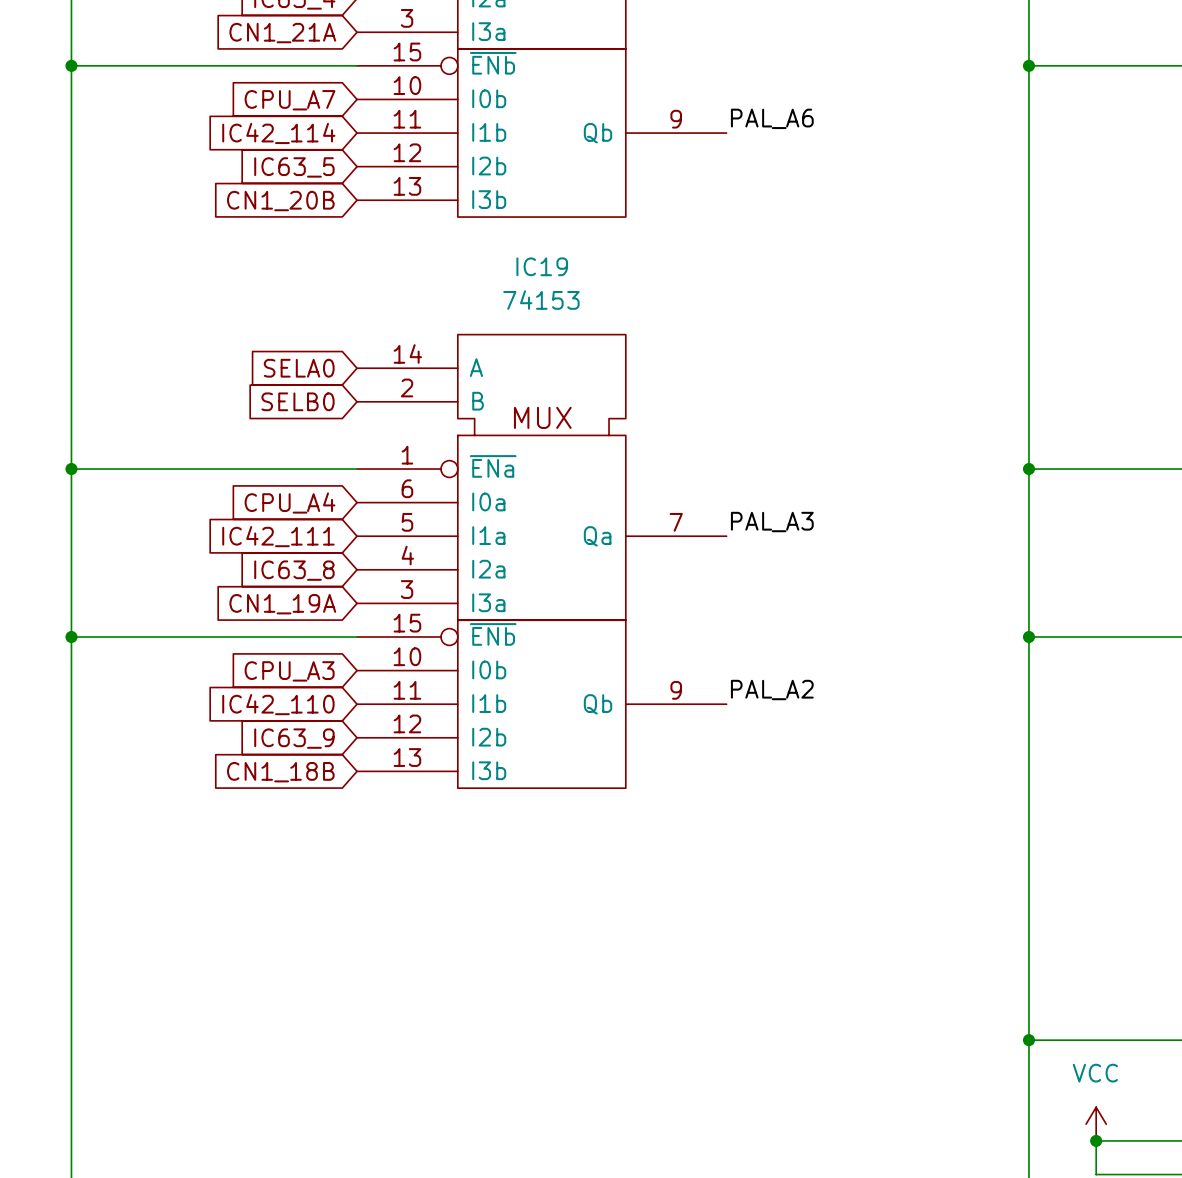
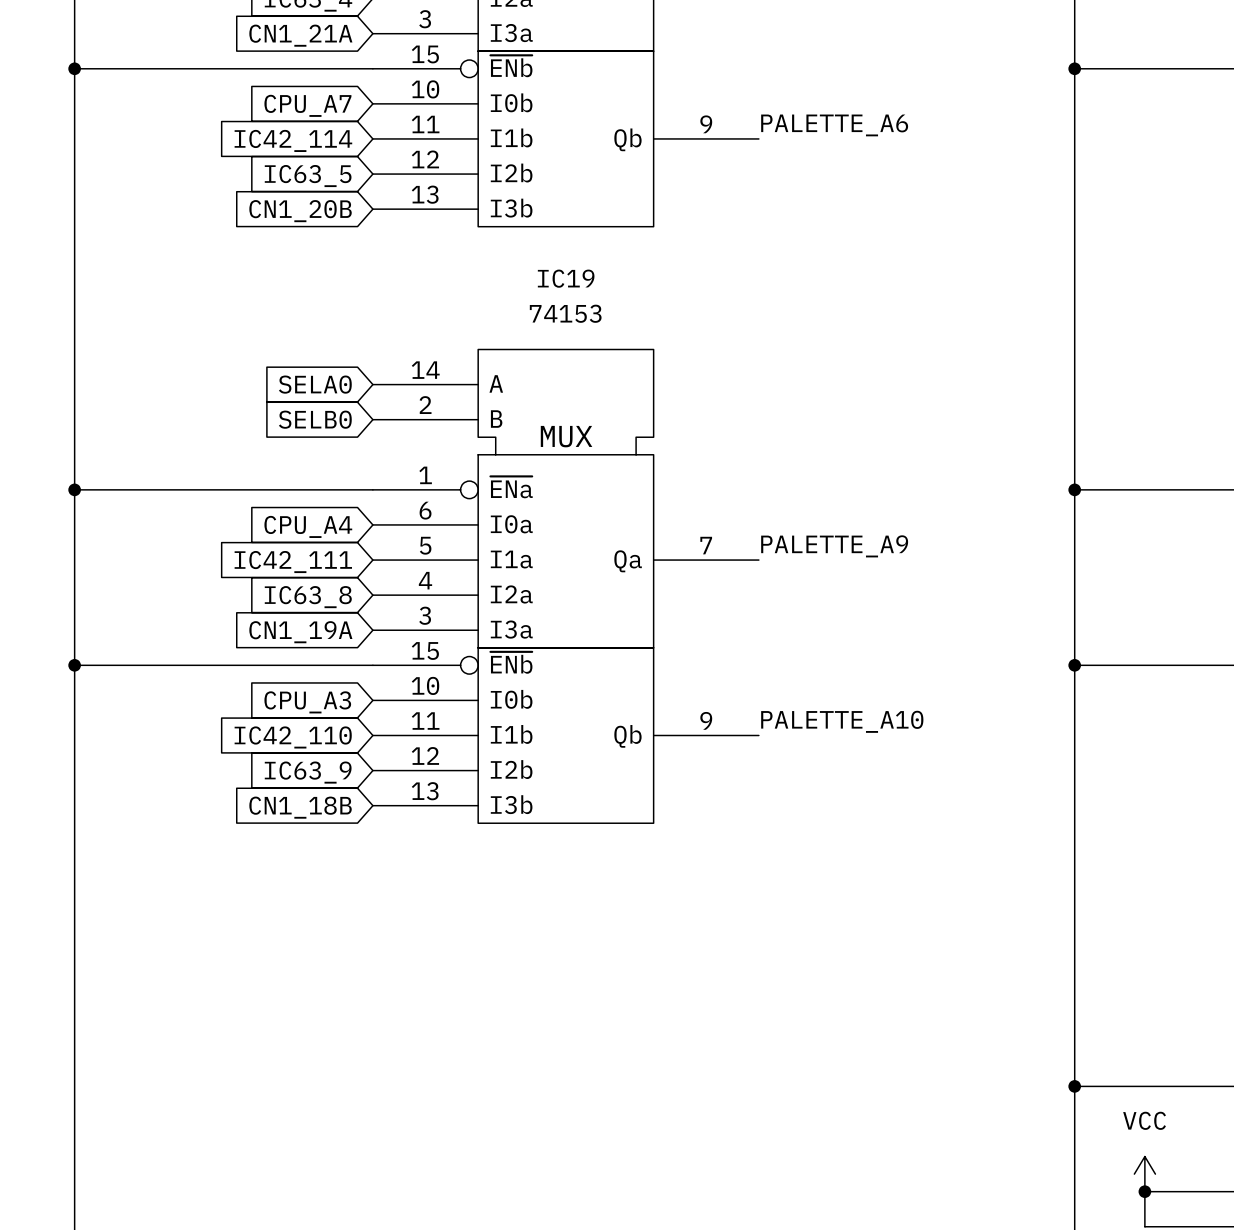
label: PAL_A6 (772, 118) -> PALETTE_A6 (834, 125)
label: PAL_A3 (772, 522) -> PALETTE_A9 (834, 546)
label: PAL_A2 (772, 690) -> PALETTE_A10 (842, 721)

